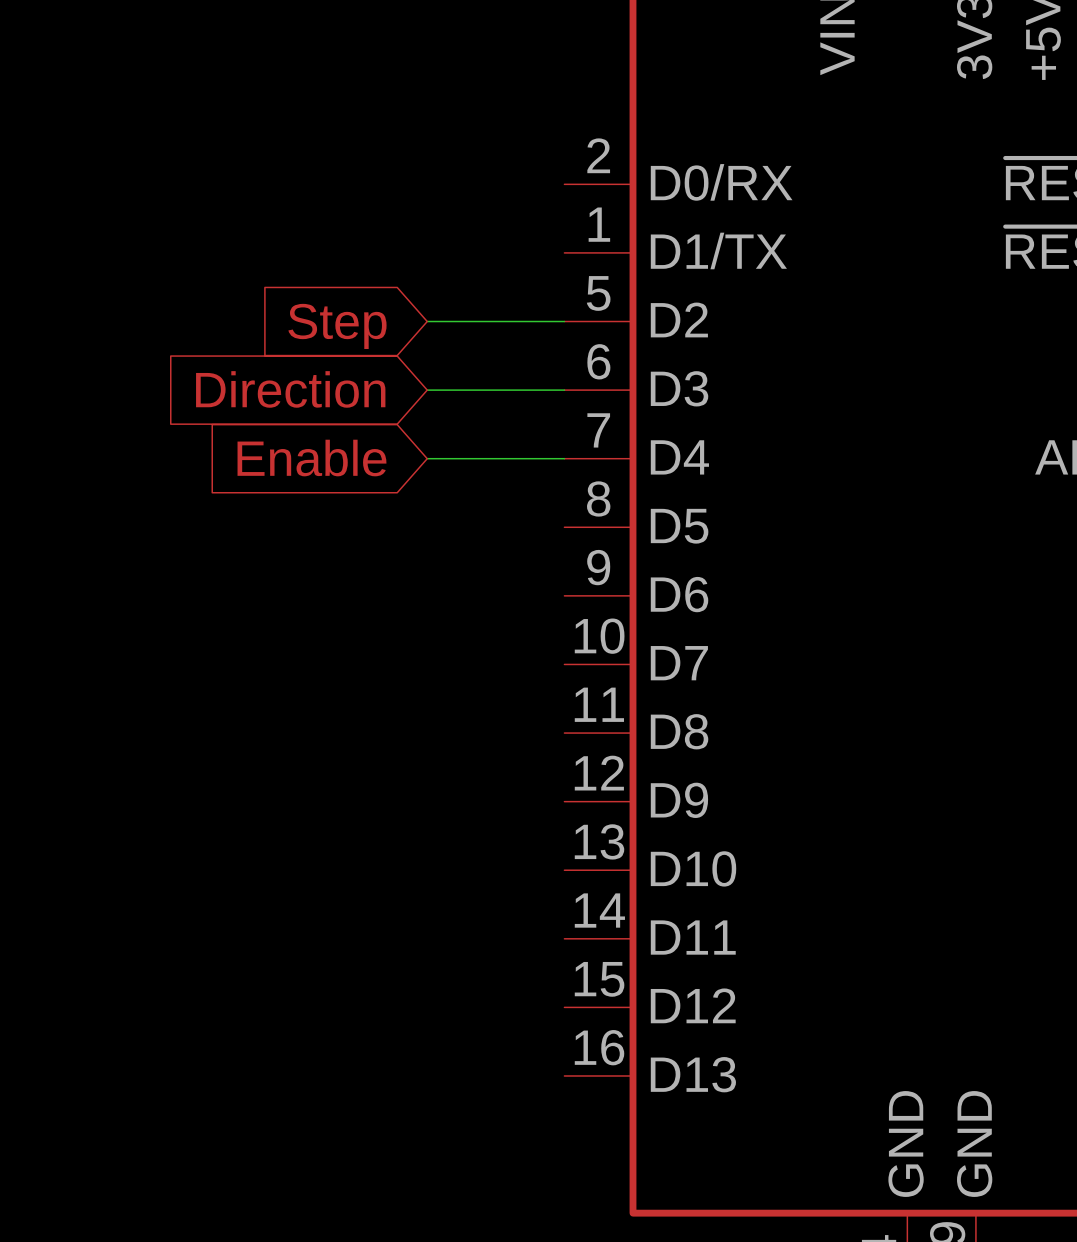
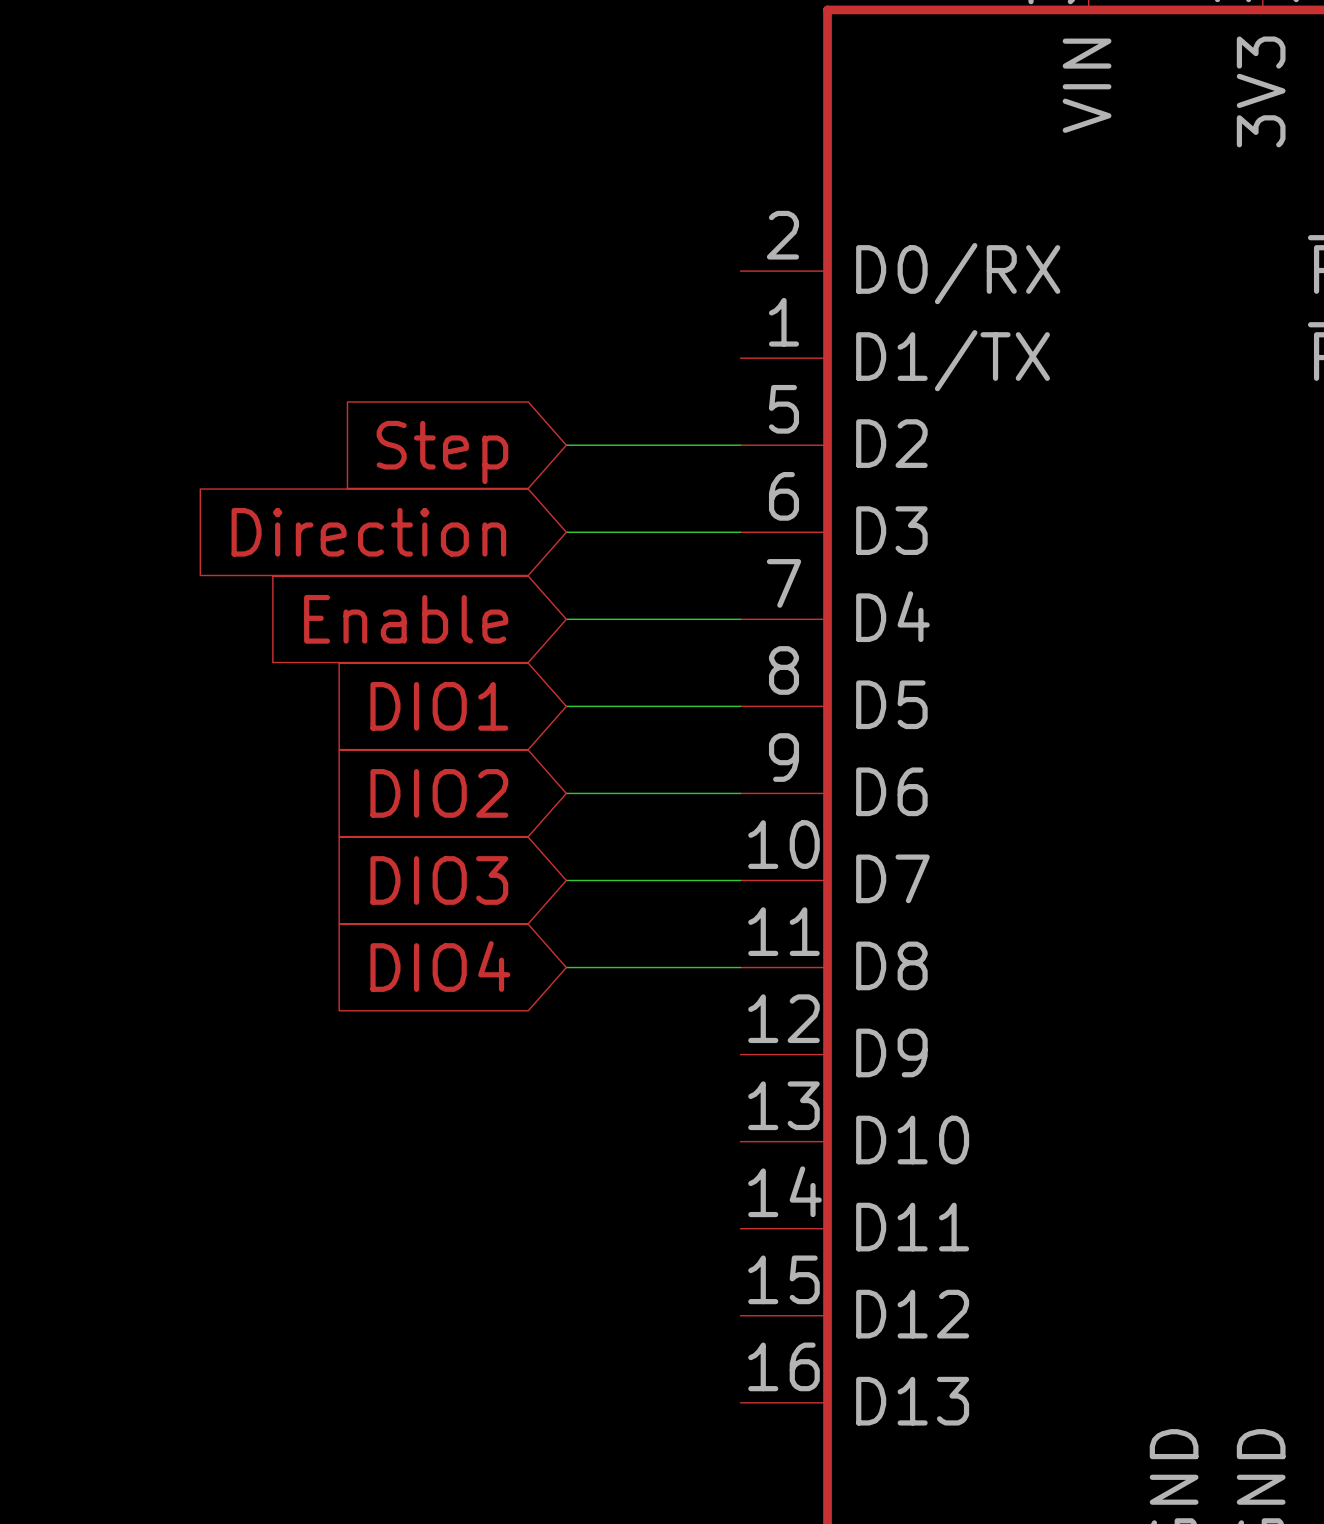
global label: none -> DIO1 (439, 706)
wire: none -> (566, 706) (740, 706)
global label: none -> DIO2 (439, 793)
wire: none -> (566, 793) (740, 793)
global label: none -> DIO3 (439, 880)
wire: none -> (566, 880) (740, 880)
global label: none -> DIO4 (440, 966)
wire: none -> (566, 967) (740, 967)

